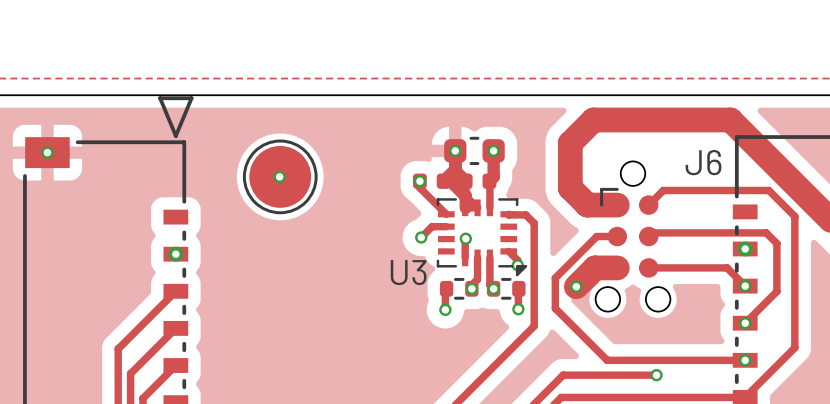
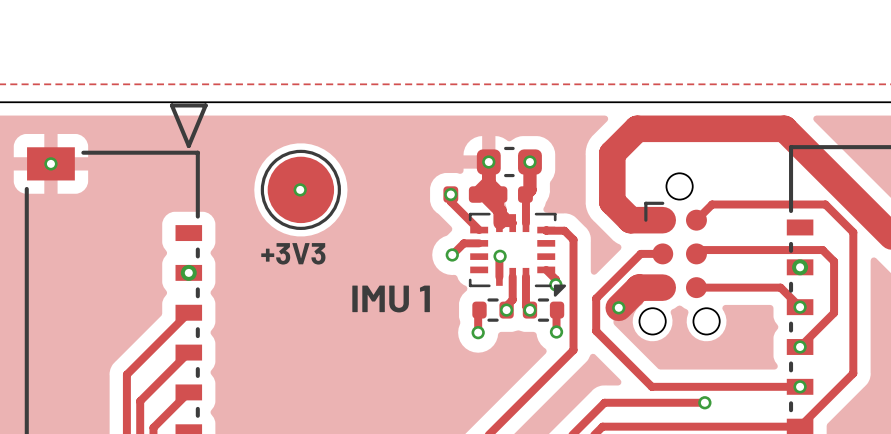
J6 name: J6 (703, 162) -> none
text: none -> +3V3 (293, 253)
U3 name: U3 (408, 272) -> none
text: none -> IMU 1 (391, 299)

